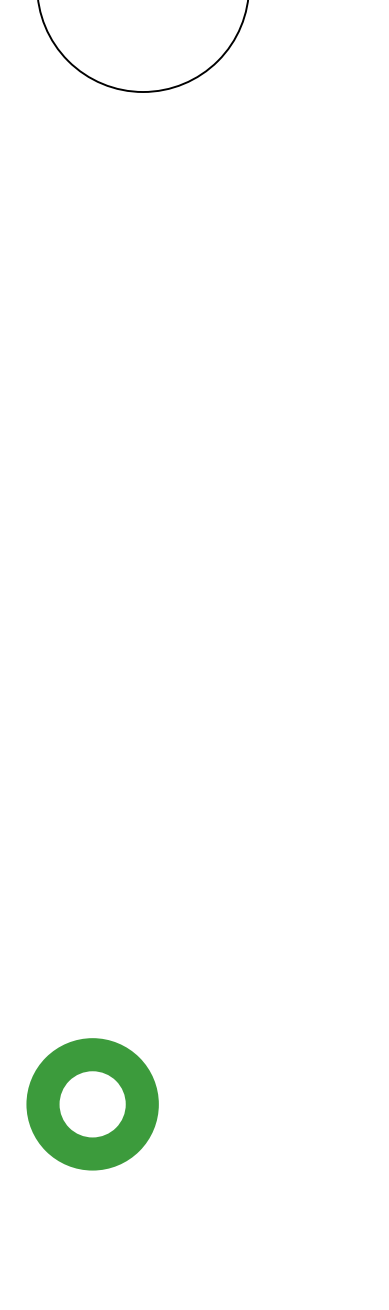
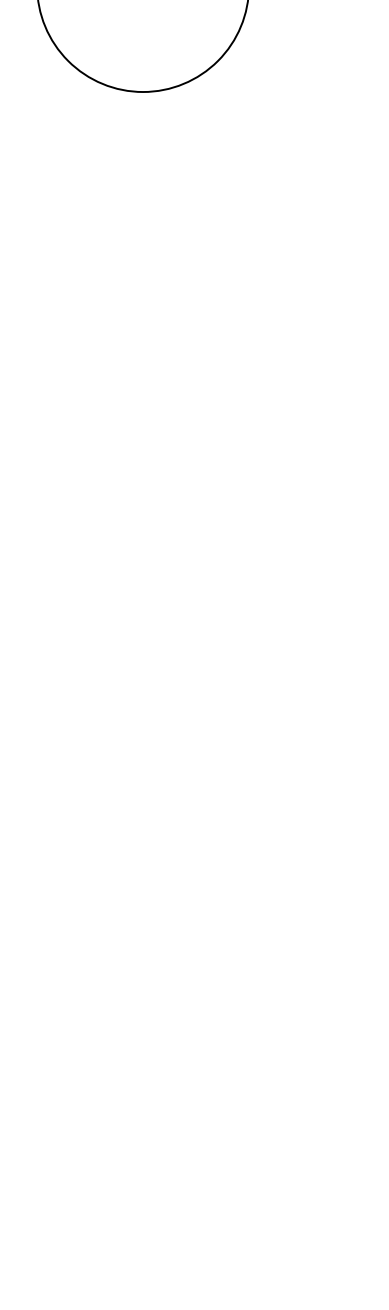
part: (92, 1104) -> none

